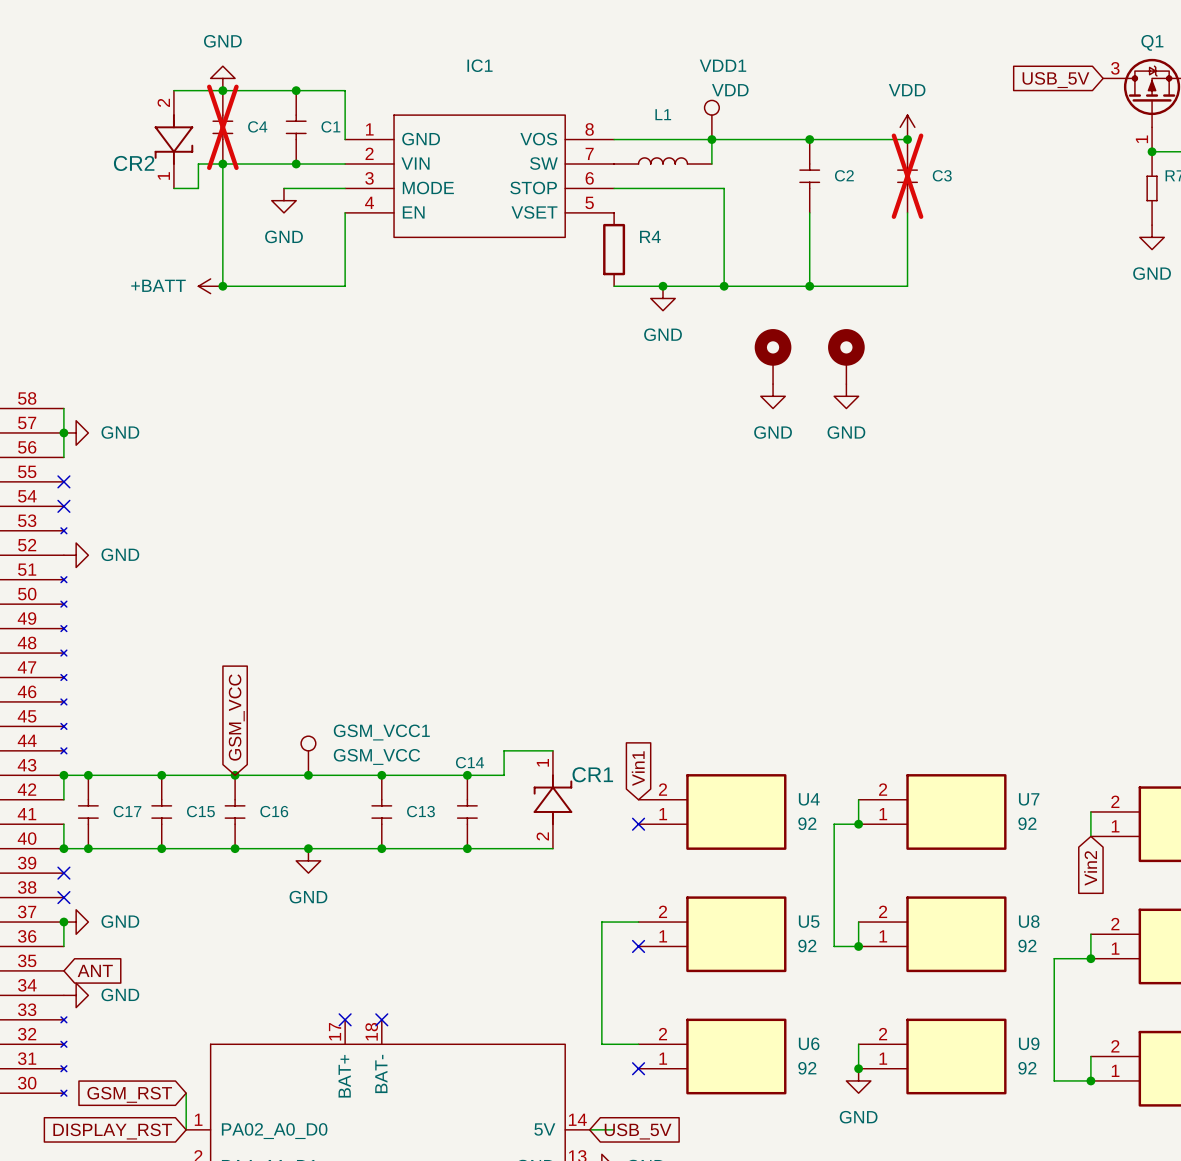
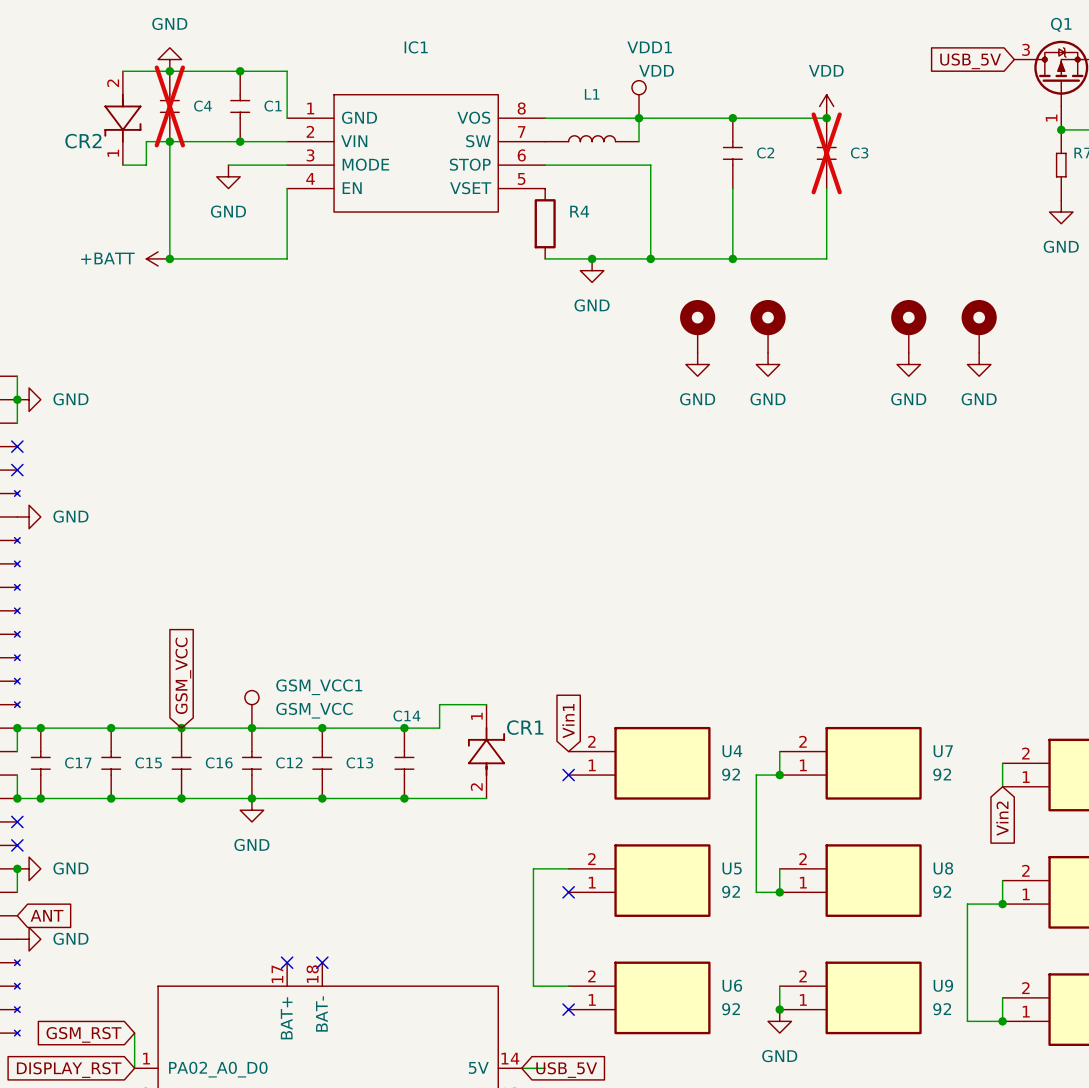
part: none -> (908, 326)
part: none -> (979, 326)
power symbol: none -> GND (908, 364)
power symbol: none -> GND (979, 364)
C12: none -> (251, 763)

